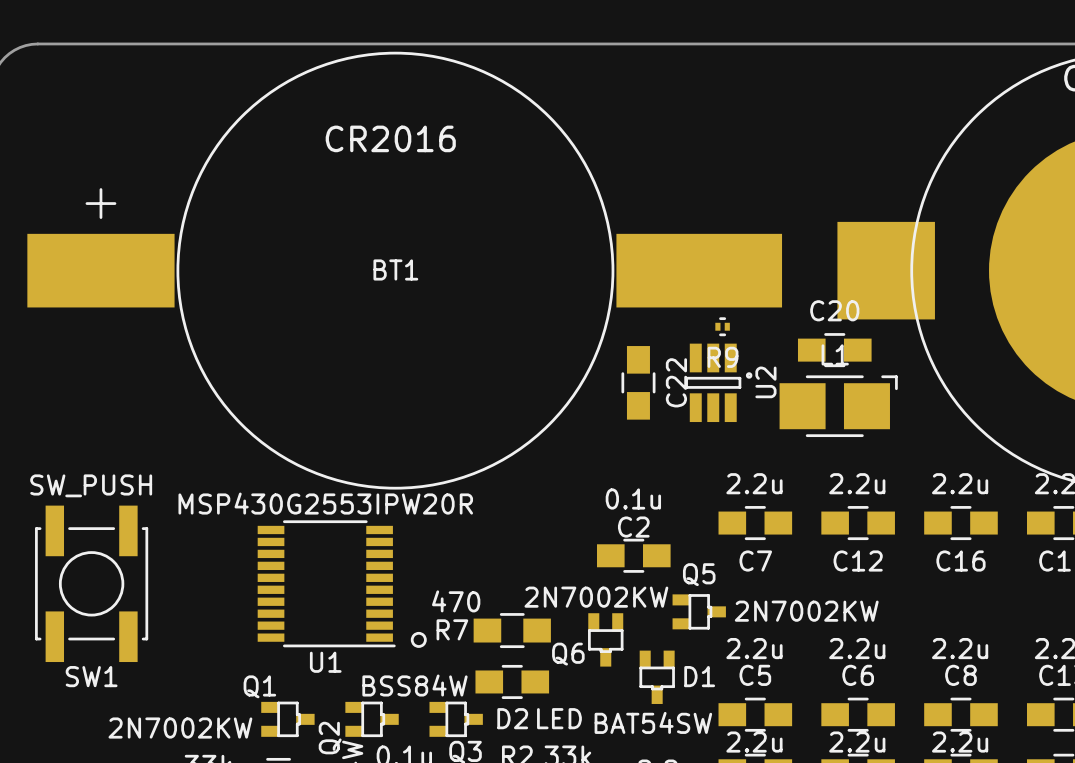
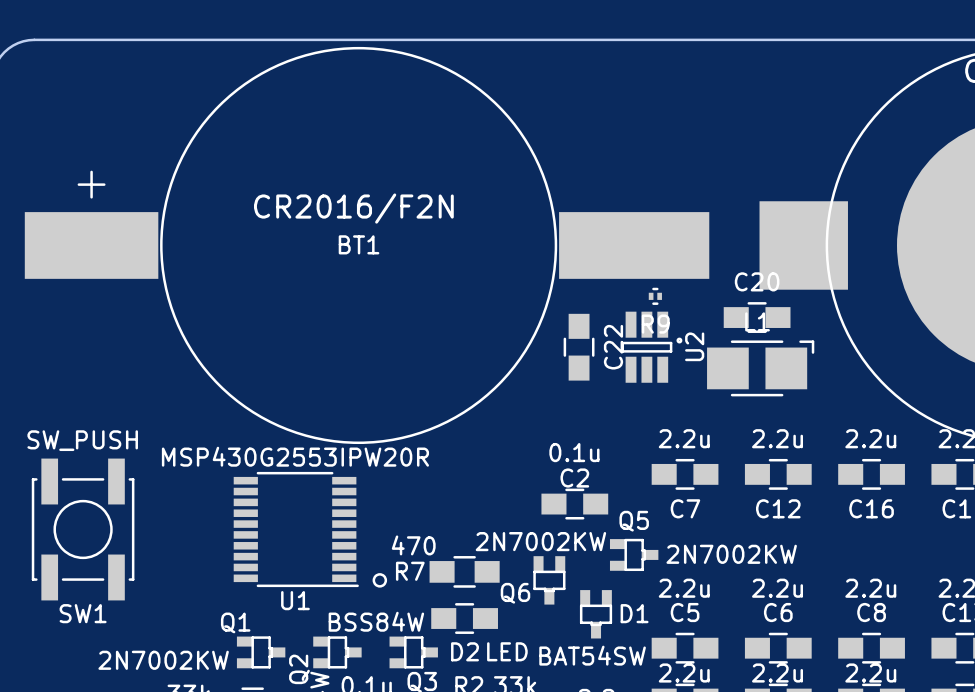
BT1 value: CR2016 (390, 138) -> CR2016/F2N (353, 208)

